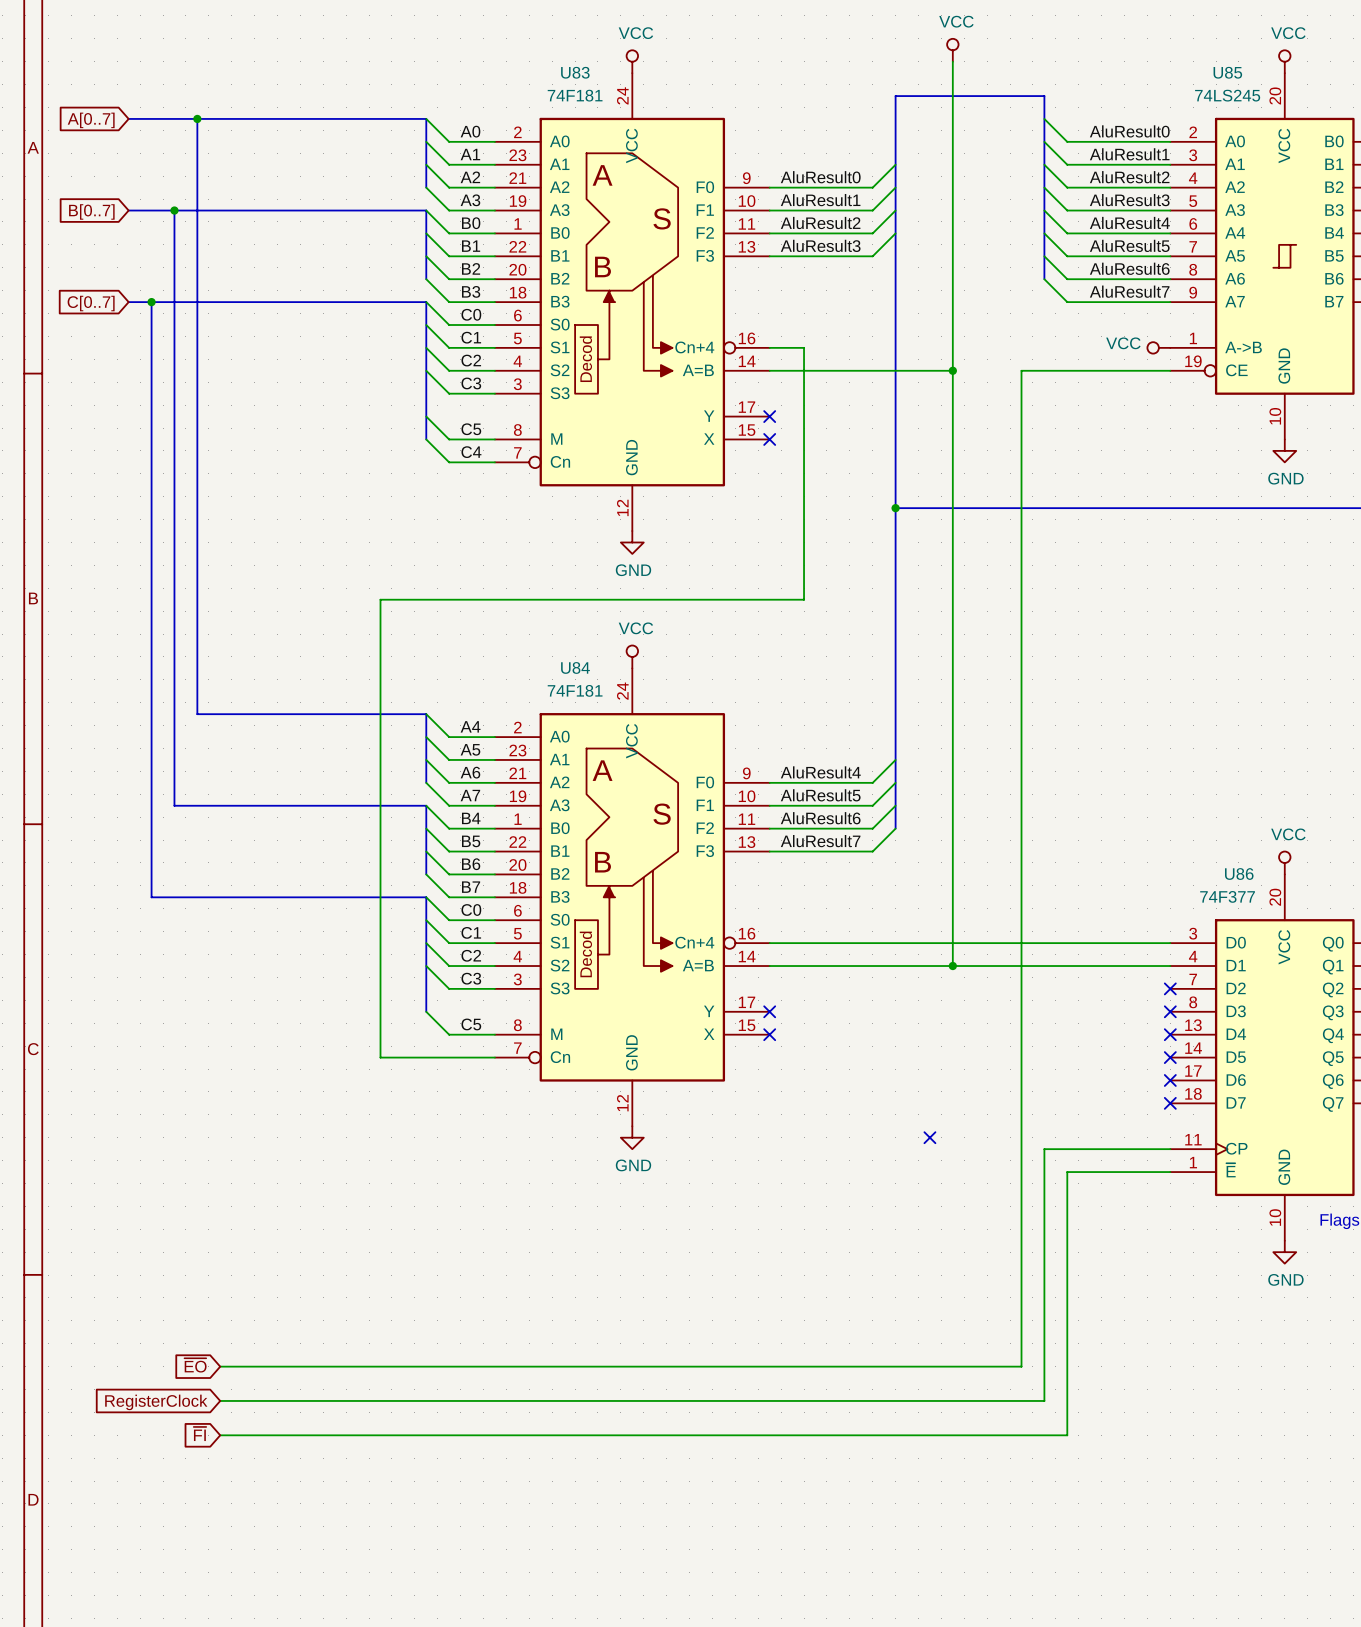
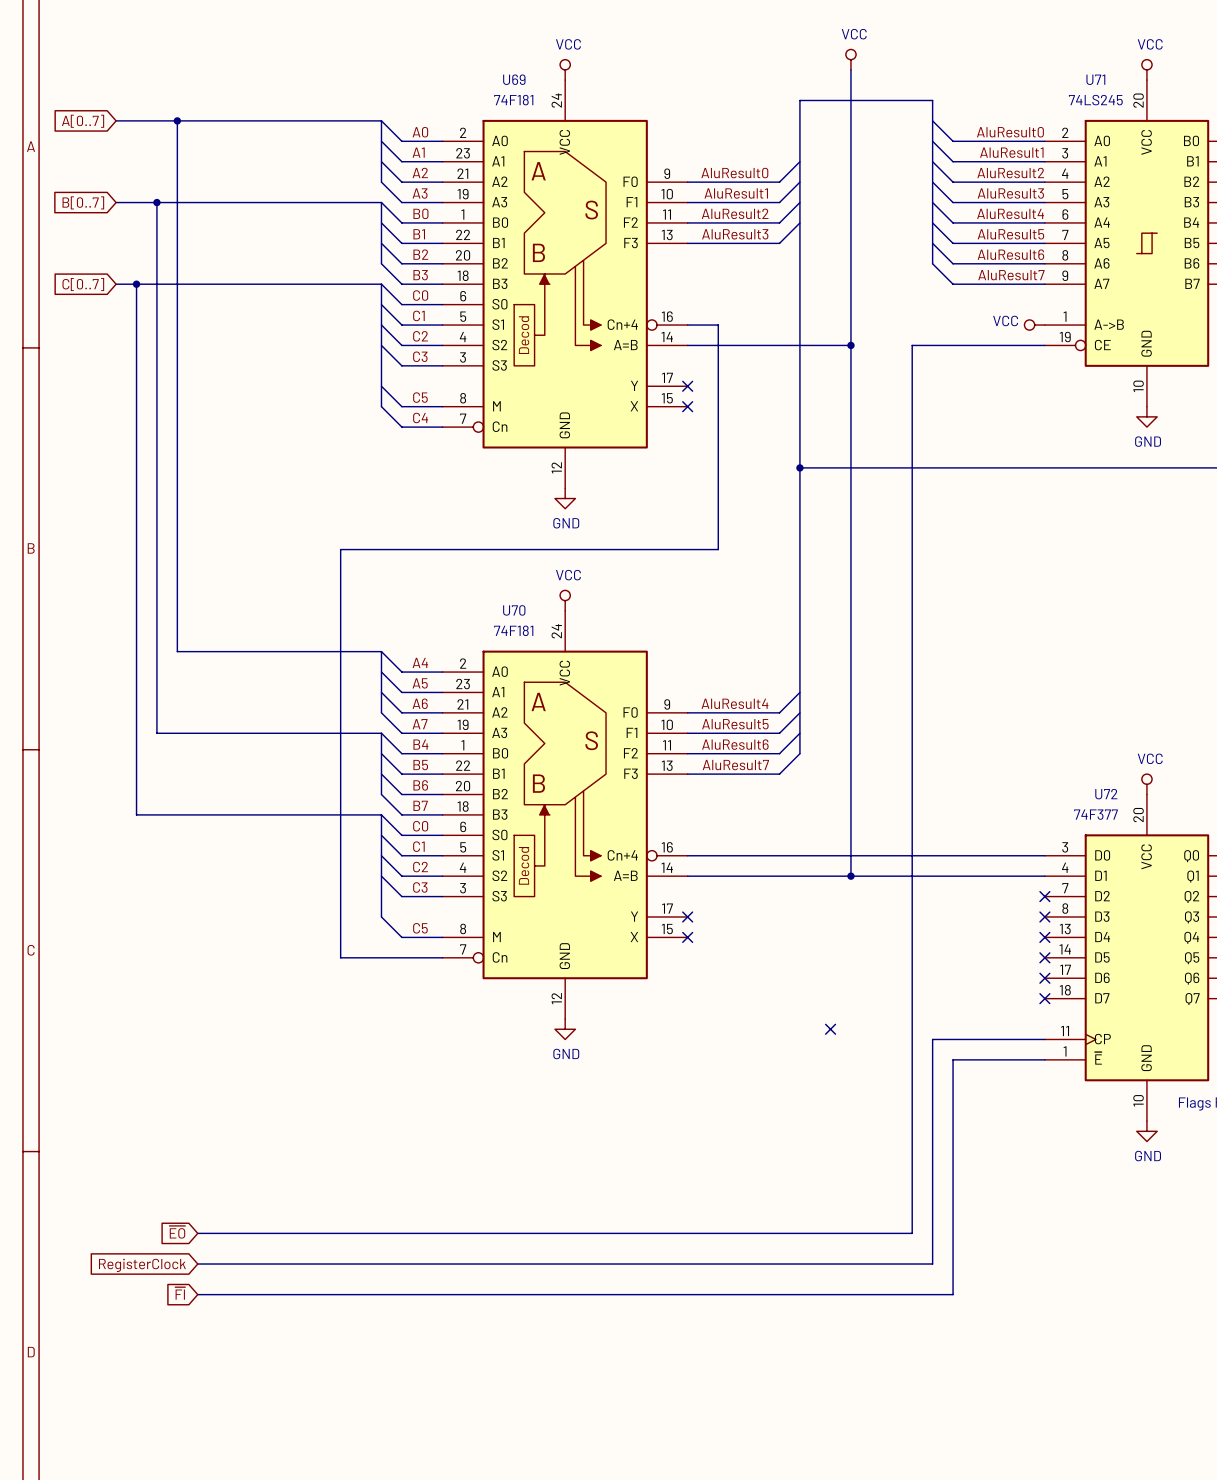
U83 name: U83 (575, 72) -> U69 (514, 79)
U85 name: U85 (1227, 72) -> U71 (1095, 79)
U84 name: U84 (575, 667) -> U70 (514, 610)
U86 name: U86 (1239, 874) -> U72 (1106, 794)

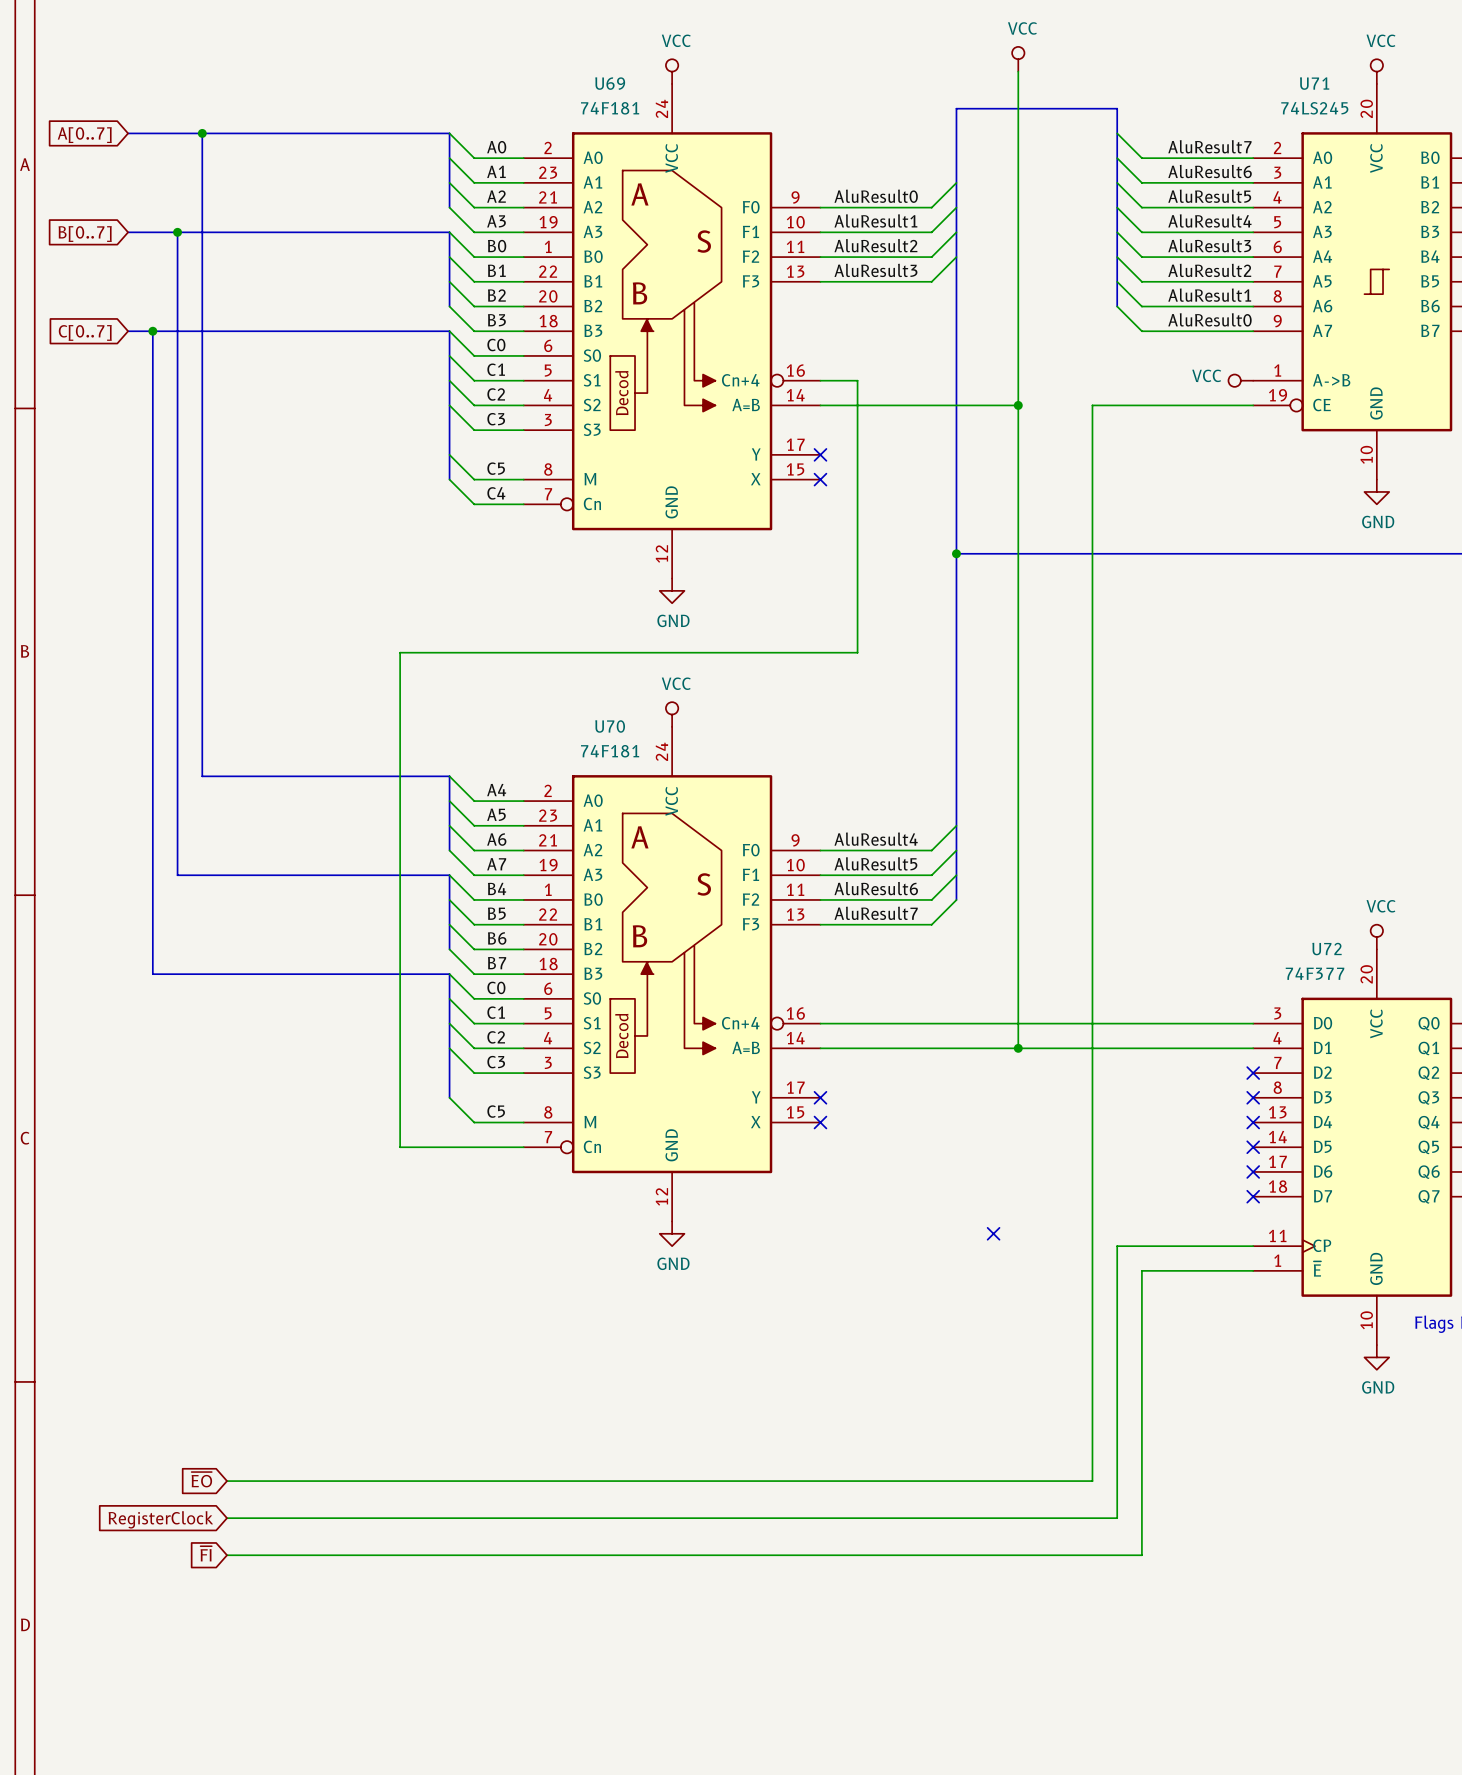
label: AluResult0 (1010, 132) -> AluResult7 (1209, 146)
label: AluResult1 (1011, 152) -> AluResult6 (1210, 171)
label: AluResult2 (1010, 173) -> AluResult5 (1209, 196)
label: AluResult3 (1010, 193) -> AluResult4 (1209, 220)
label: AluResult4 (1010, 213) -> AluResult3 (1209, 245)
label: AluResult5 (1010, 234) -> AluResult2 (1209, 270)
label: AluResult6 (1010, 254) -> AluResult1 (1209, 295)
label: AluResult7 (1011, 275) -> AluResult0 (1209, 319)

